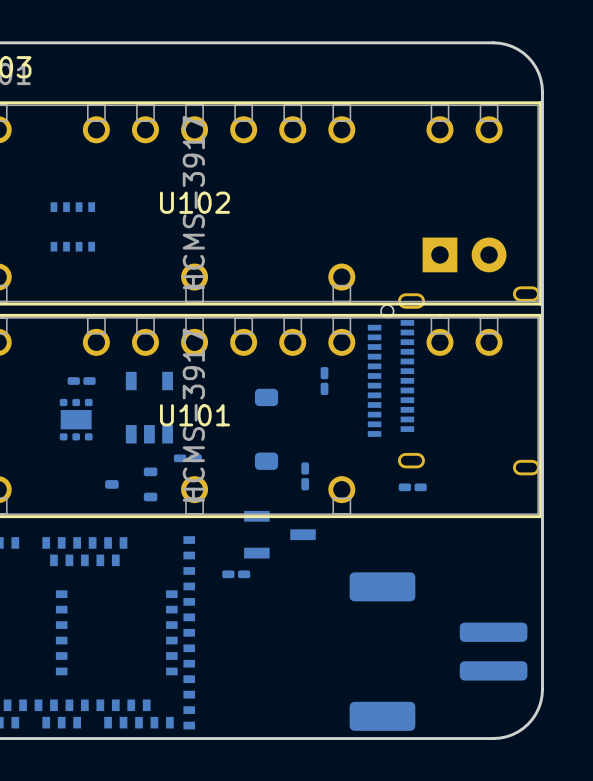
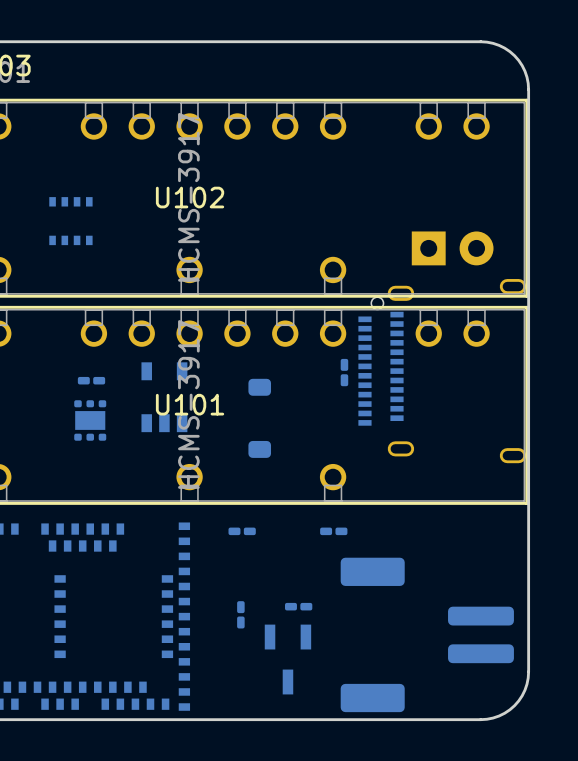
part position: (81, 381) -> (91, 380)
part position: (324, 381) -> (344, 372)
part position: (149, 407) -> (164, 397)
part position: (76, 419) -> (90, 420)
part: (187, 458) -> none
part: (305, 476) -> none
part: (131, 484) -> none
part: (412, 487) -> none
part rotation: 0° (279, 534) -> 90° clockwise (287, 659)
part position: (279, 534) -> (287, 659)
part: none -> (242, 531)
part: none -> (333, 531)
part: (236, 574) -> none
part: none -> (298, 606)
part: none -> (240, 614)

